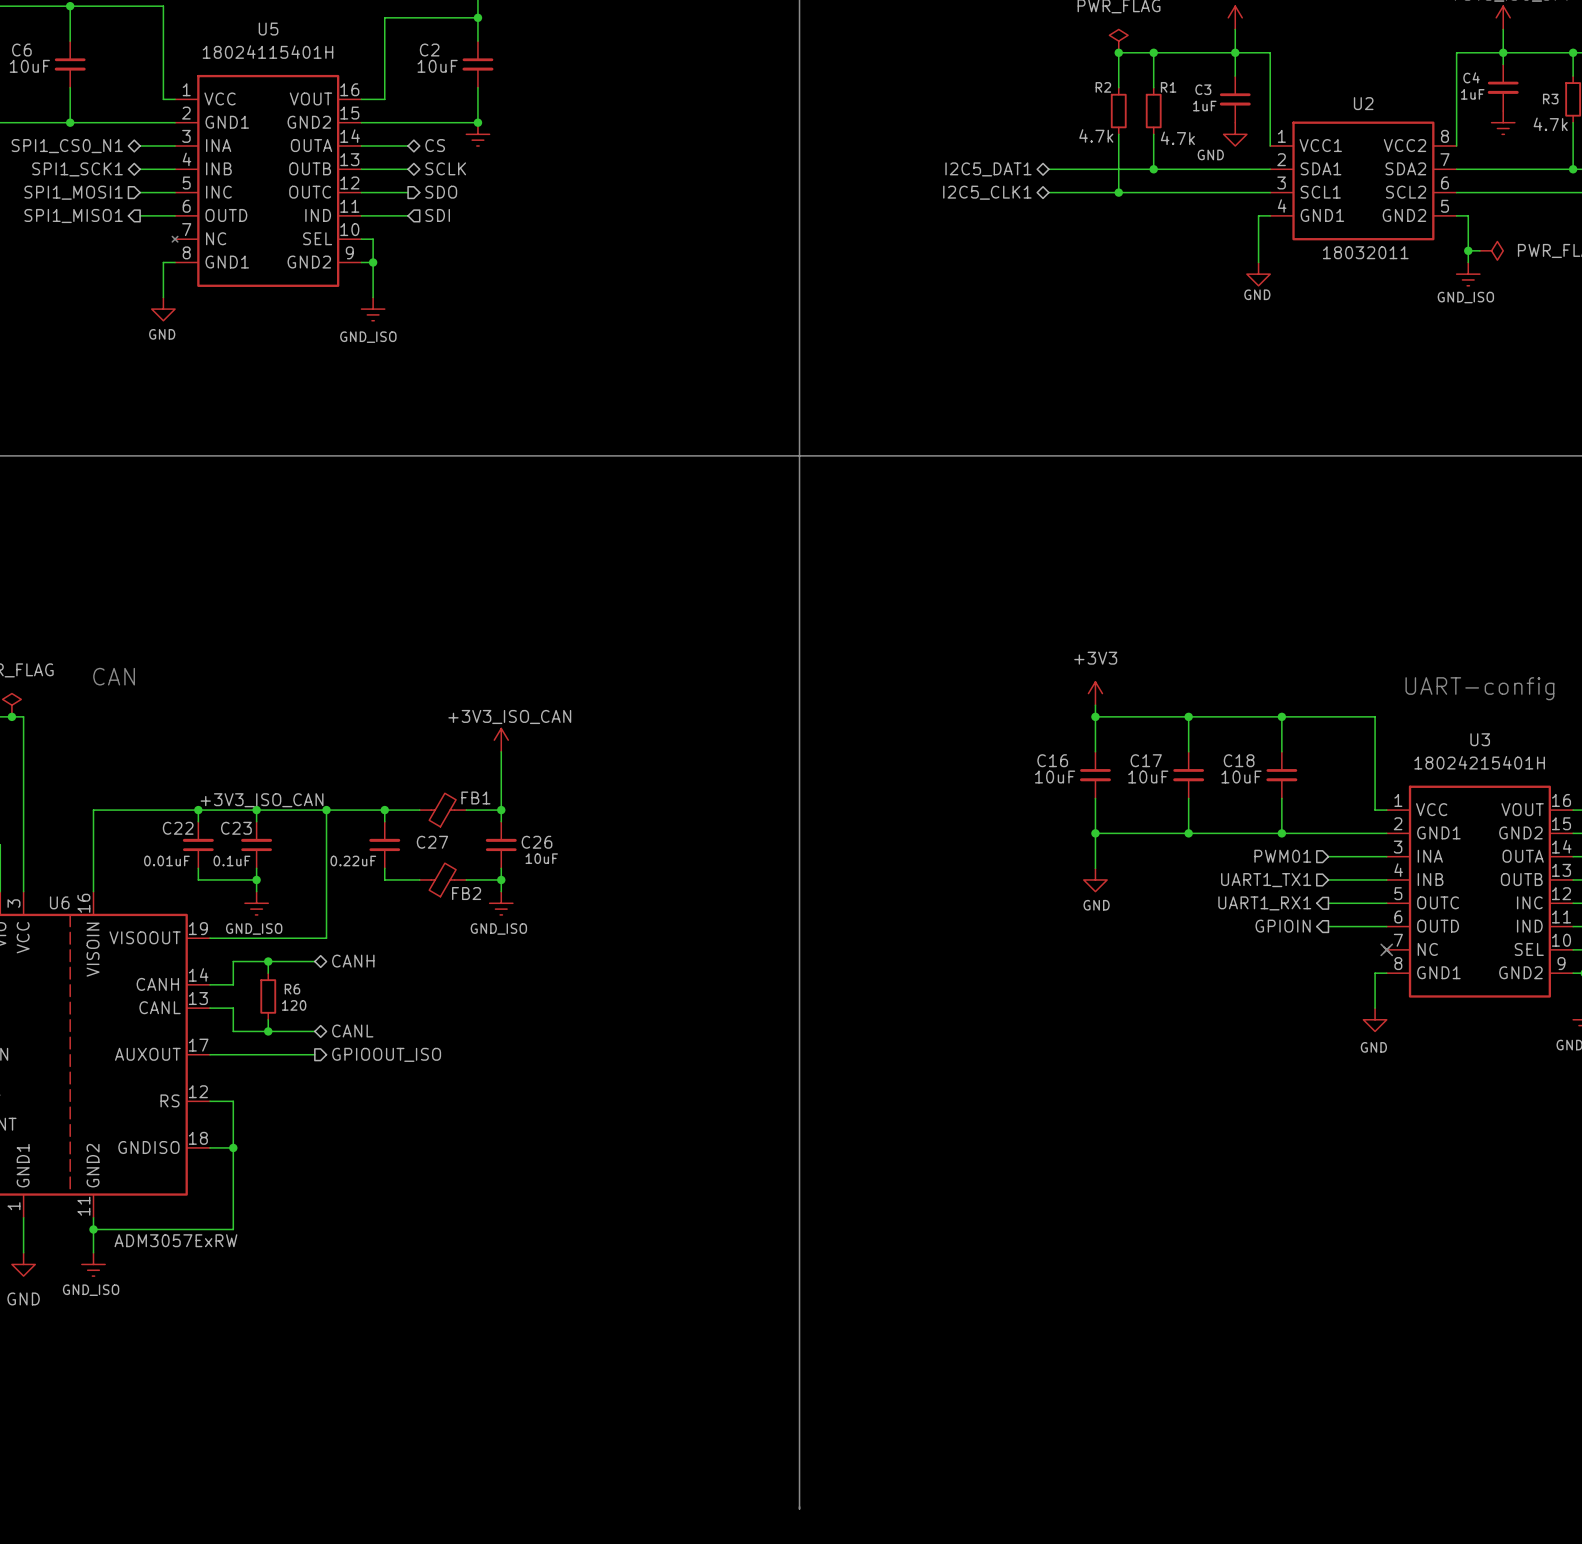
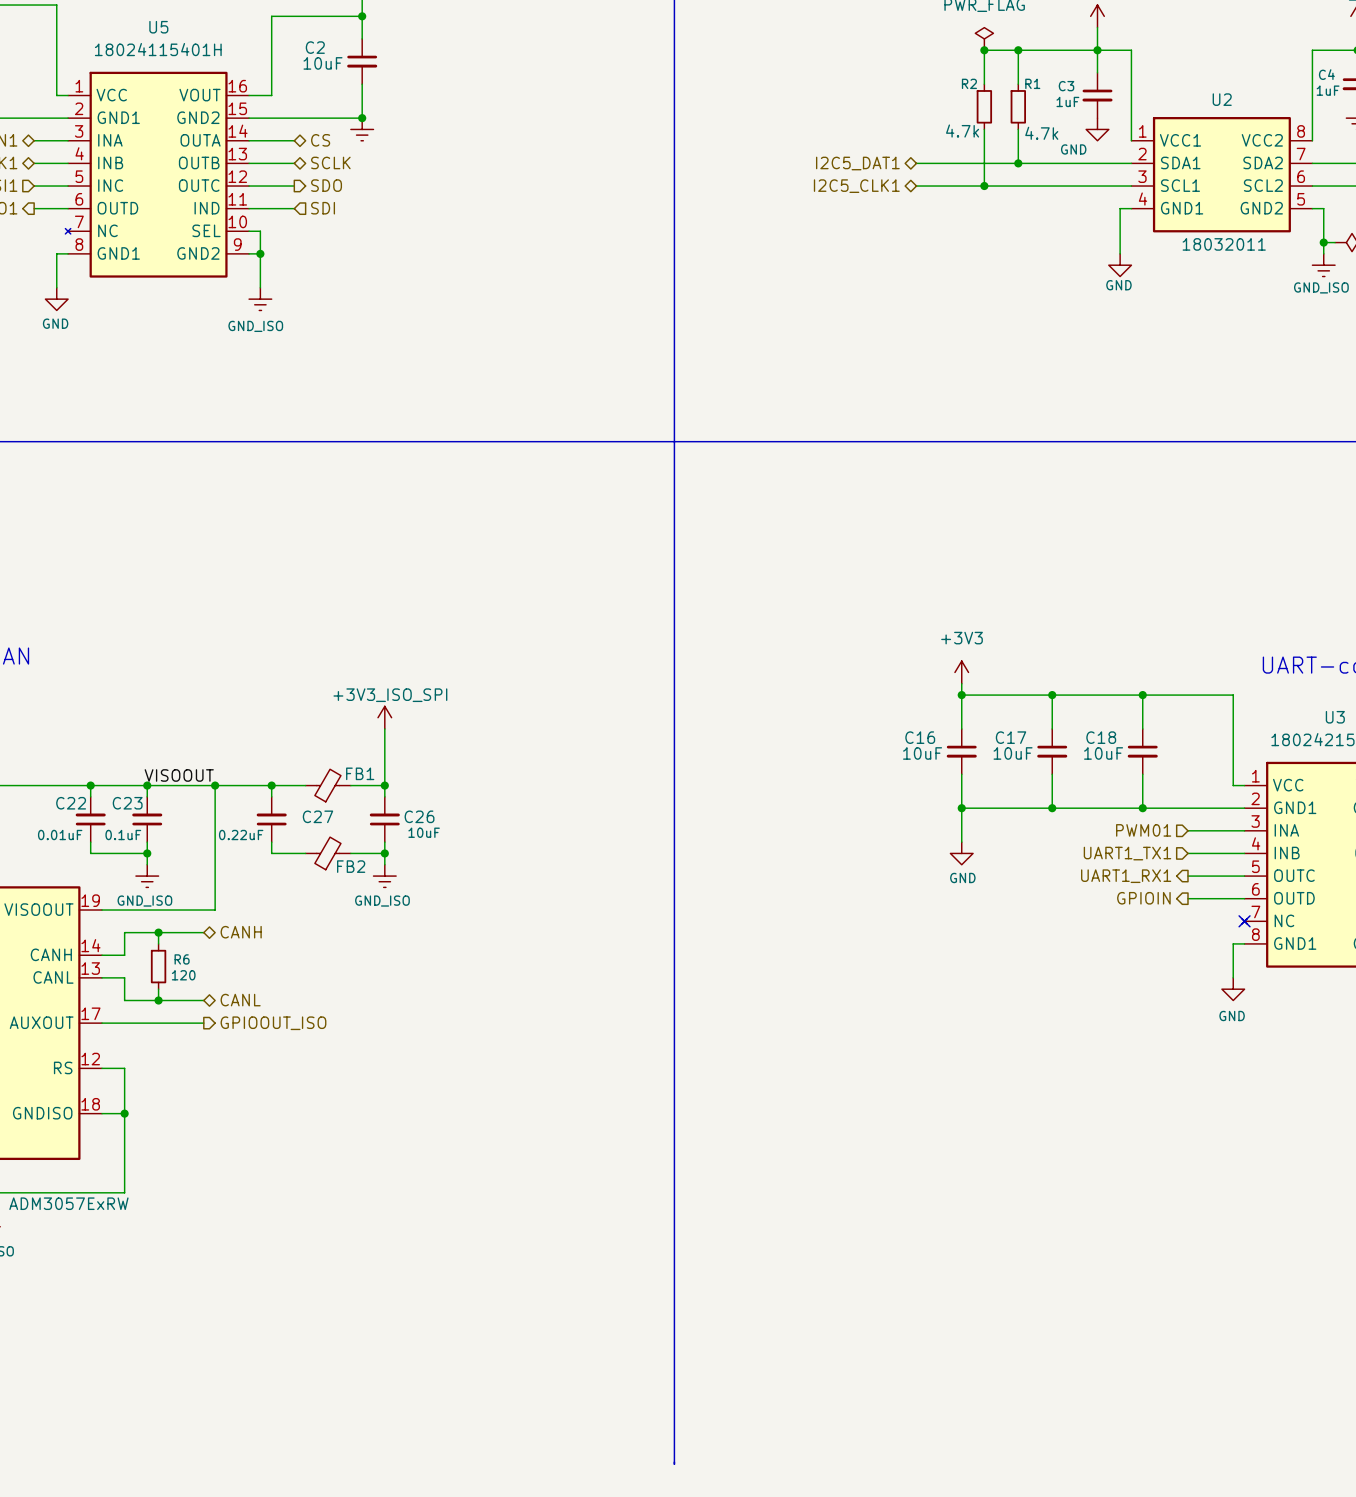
power symbol: +3V3_ISO_CAN (501, 740) -> +3V3_ISO_SPI (384, 717)
label: +3V3_ISO_CAN (262, 800) -> VISOOUT (179, 775)

